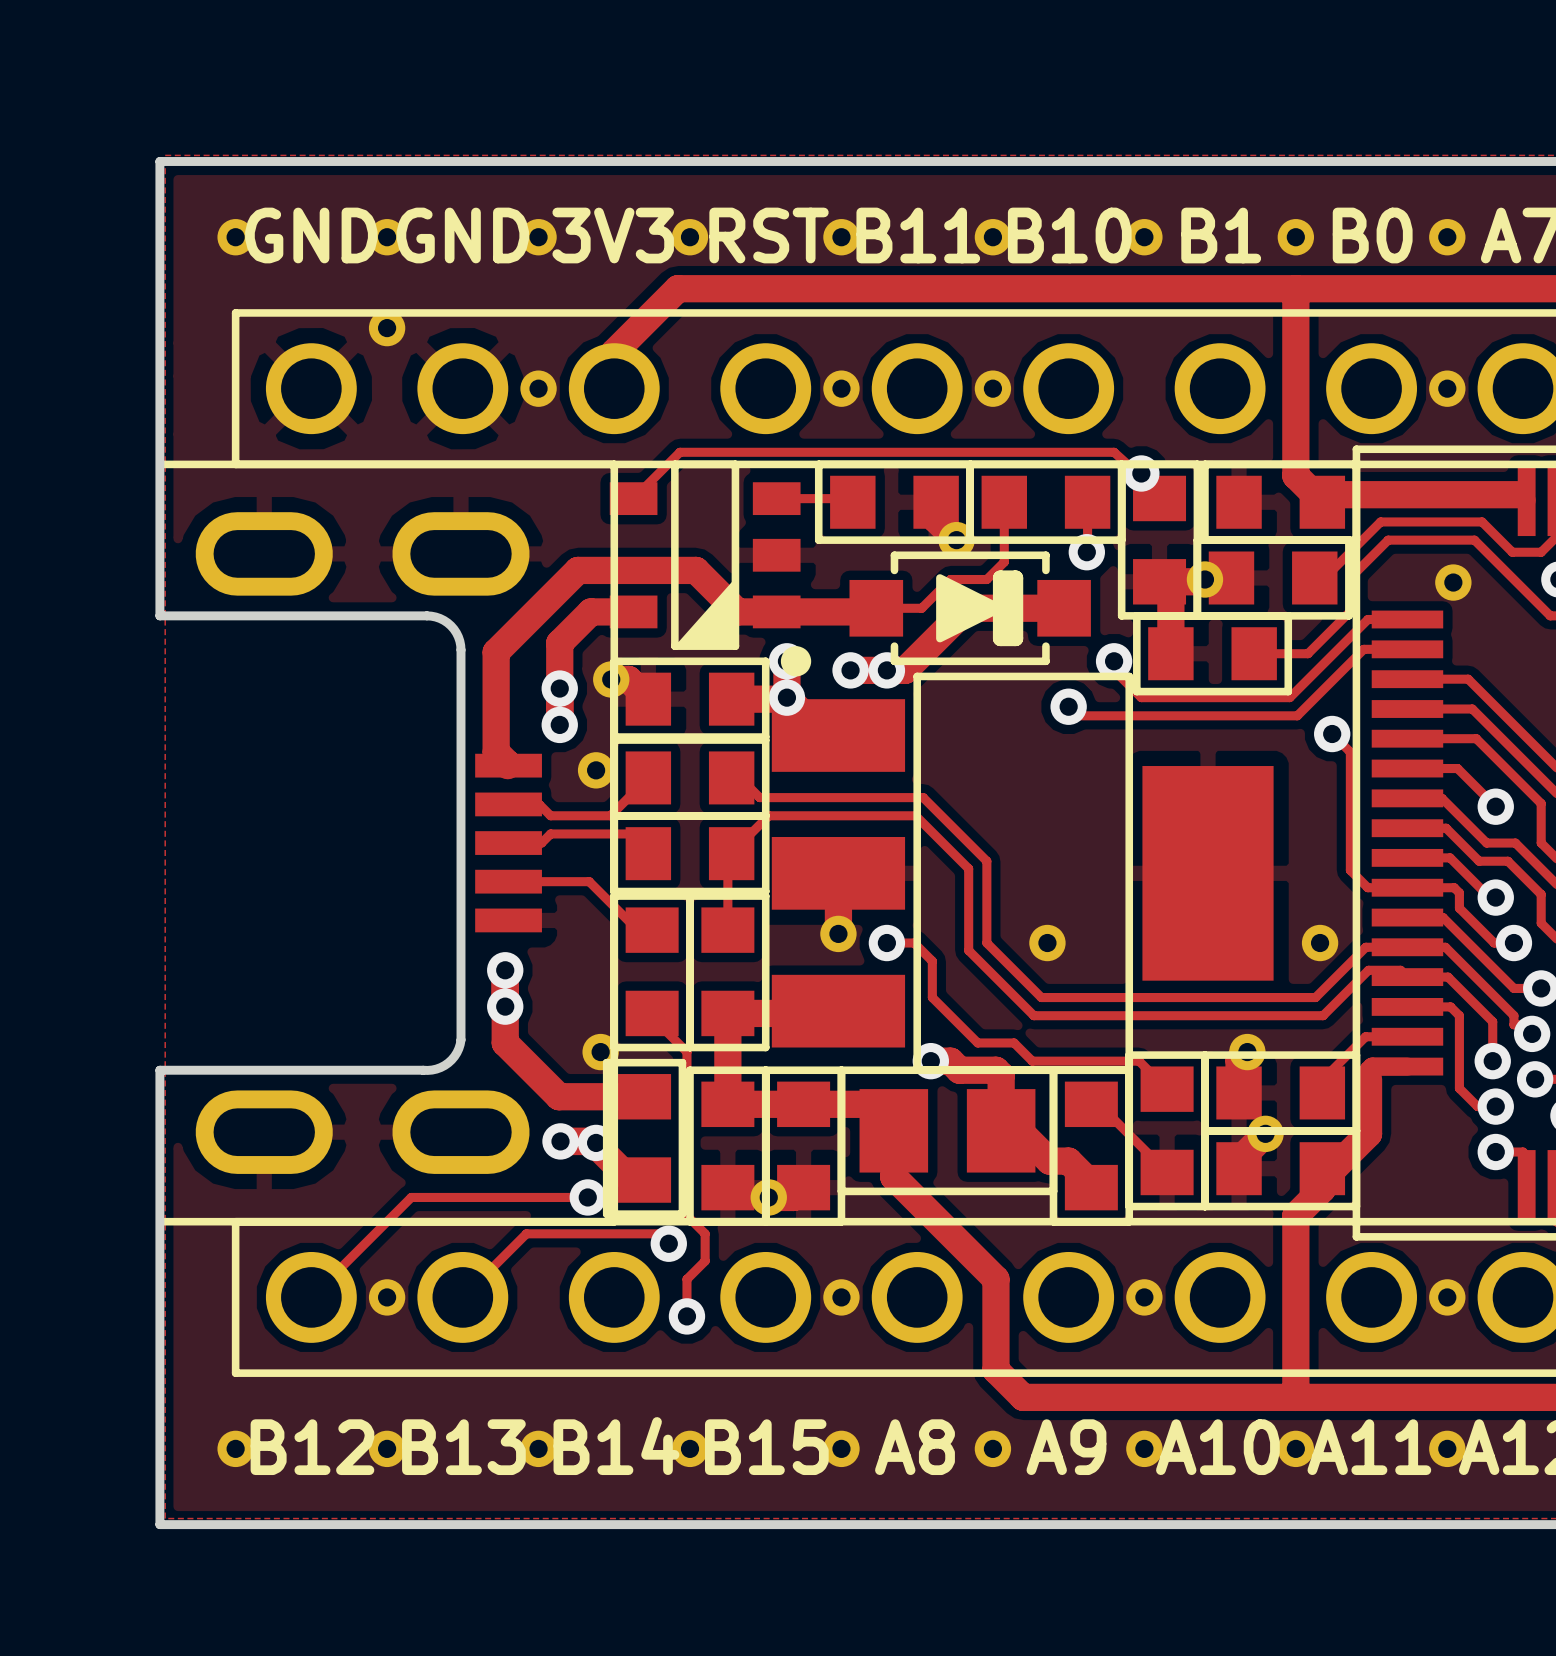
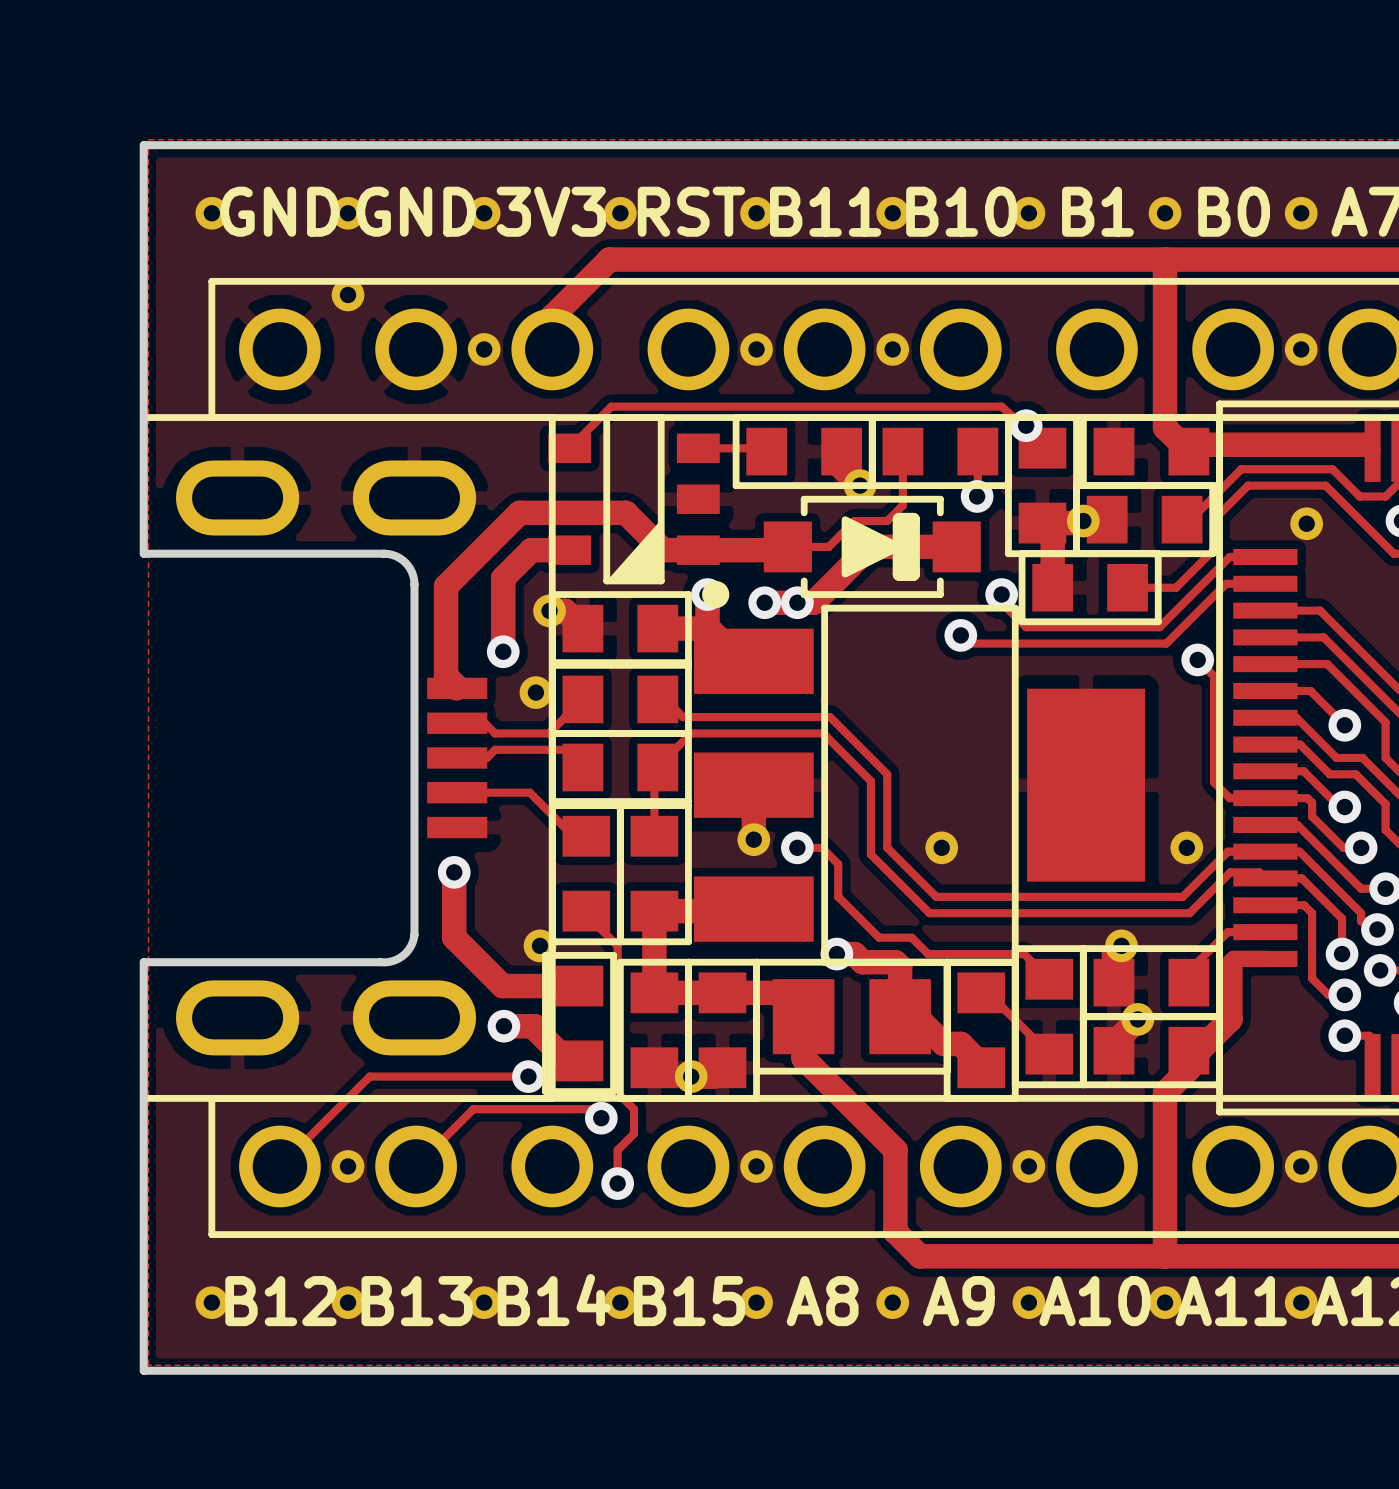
via: (559, 688) -> none
via: (786, 697) -> none
via: (505, 1006) -> none
via: (596, 1142) -> none

